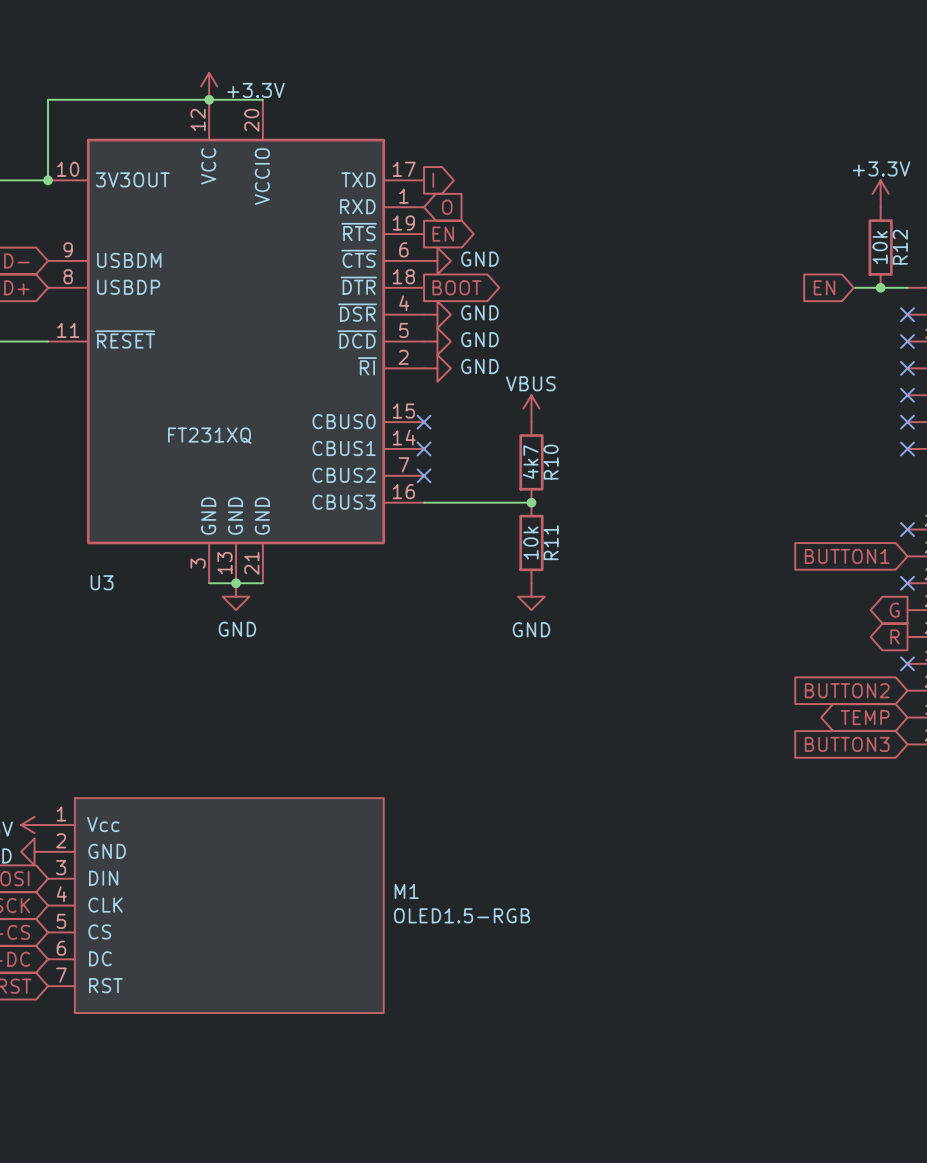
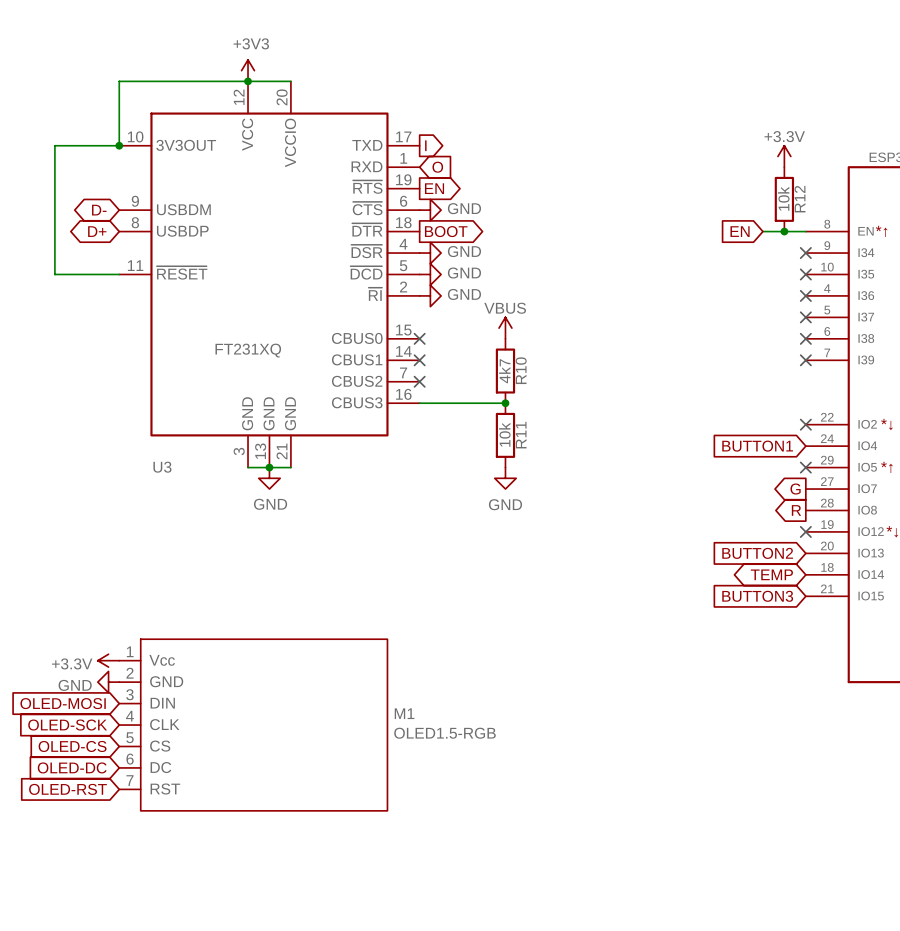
power symbol: +3.3V (209, 86) -> +3V3 (248, 70)

